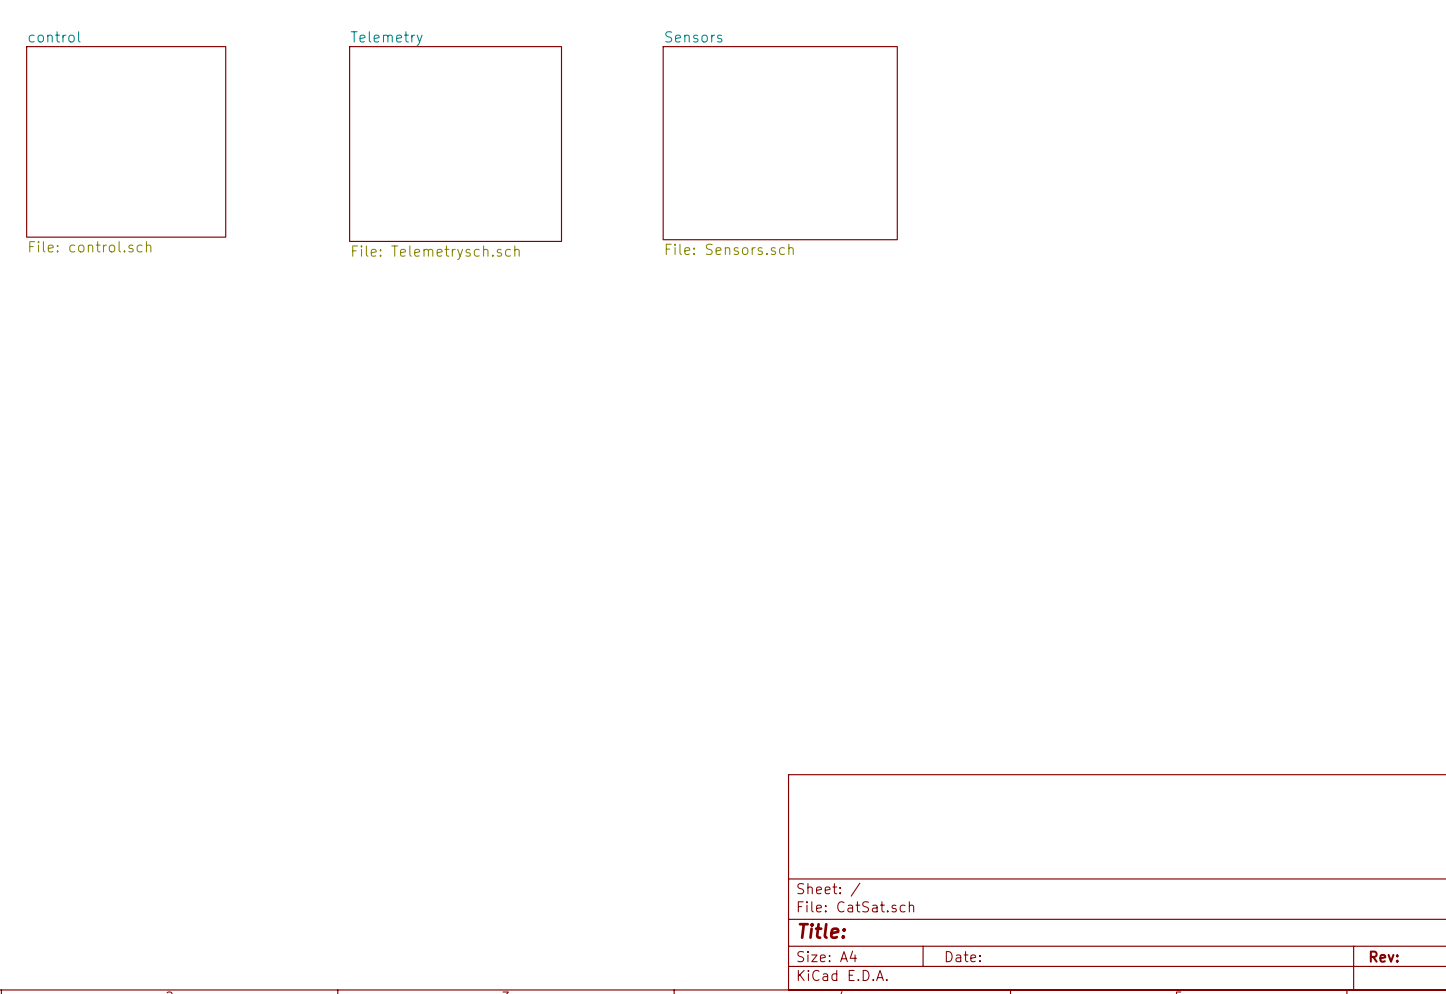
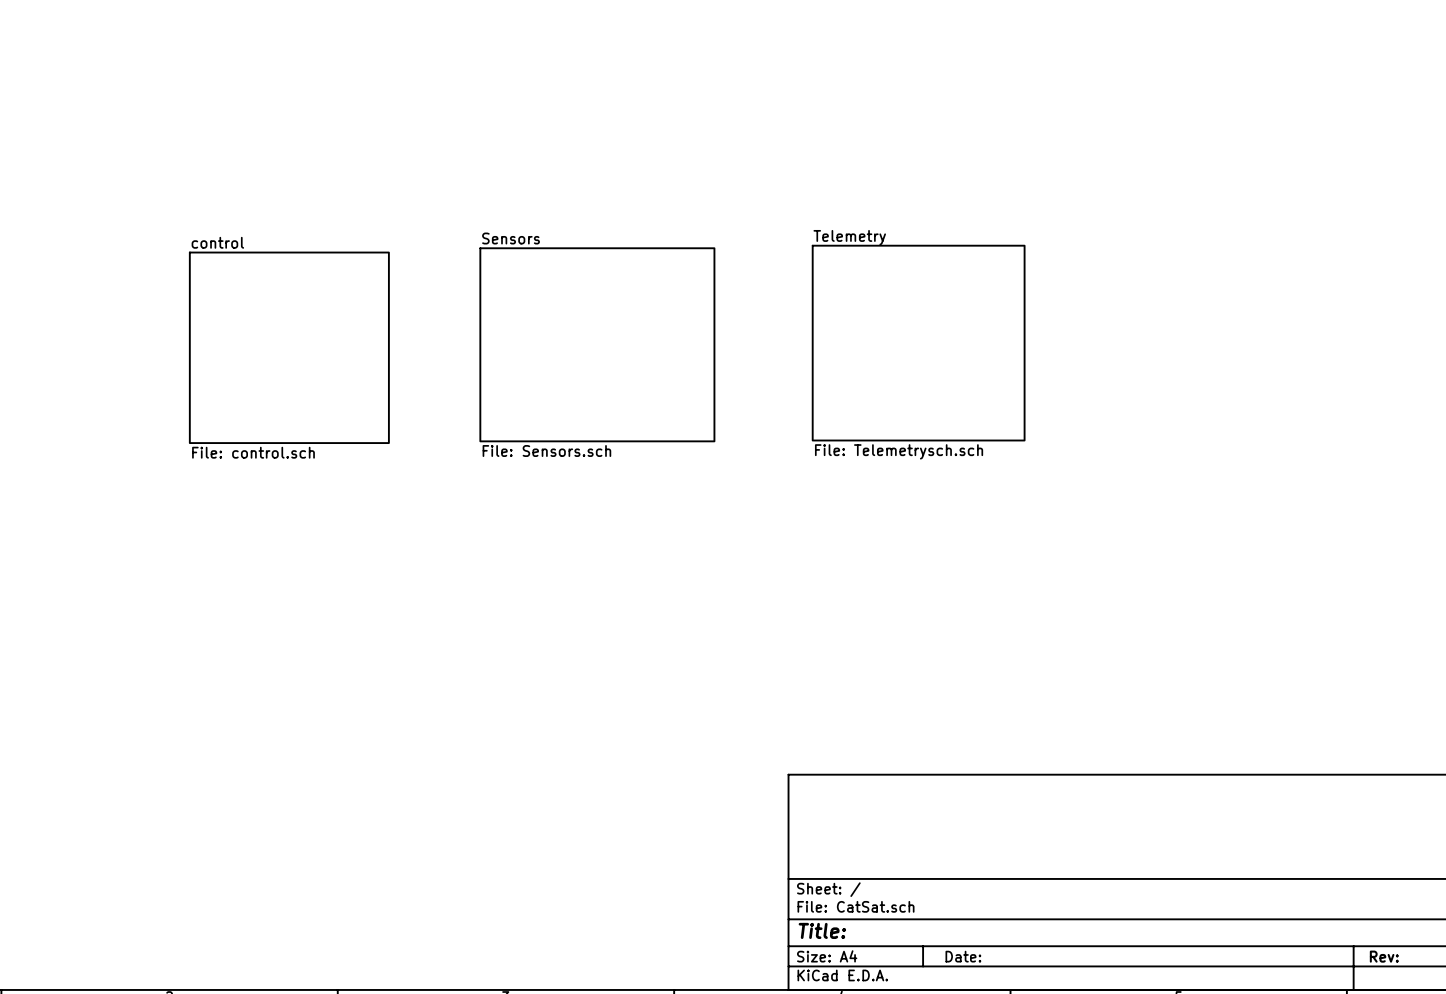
sheet control: File: control.sch (126, 141) -> none
sheet Sensors: File: Sensors.sch (780, 143) -> none
sheet Telemetry: File: Telemetrysch.sch (455, 144) -> none
sheet Telemetry: none -> File: Telemetrysch.sch (918, 343)
sheet Sensors: none -> File: Sensors.sch (597, 344)
sheet control: none -> File: control.sch (289, 347)

